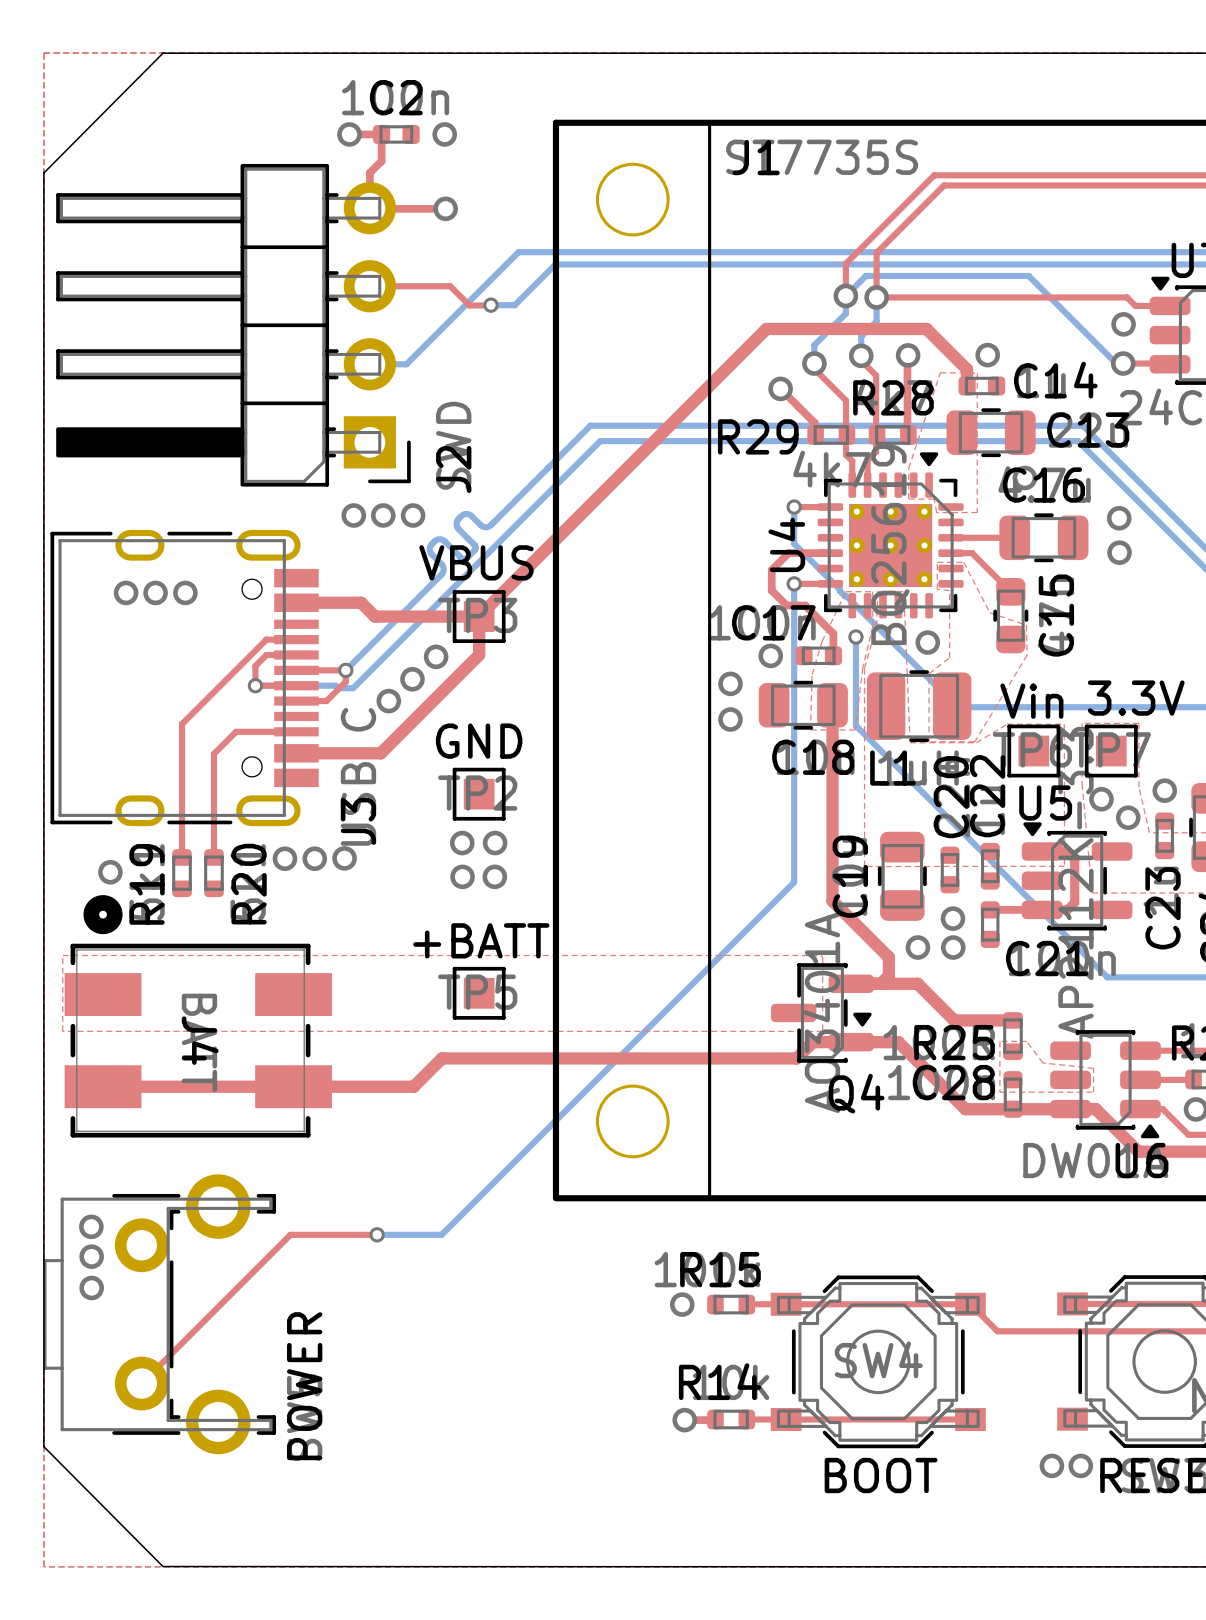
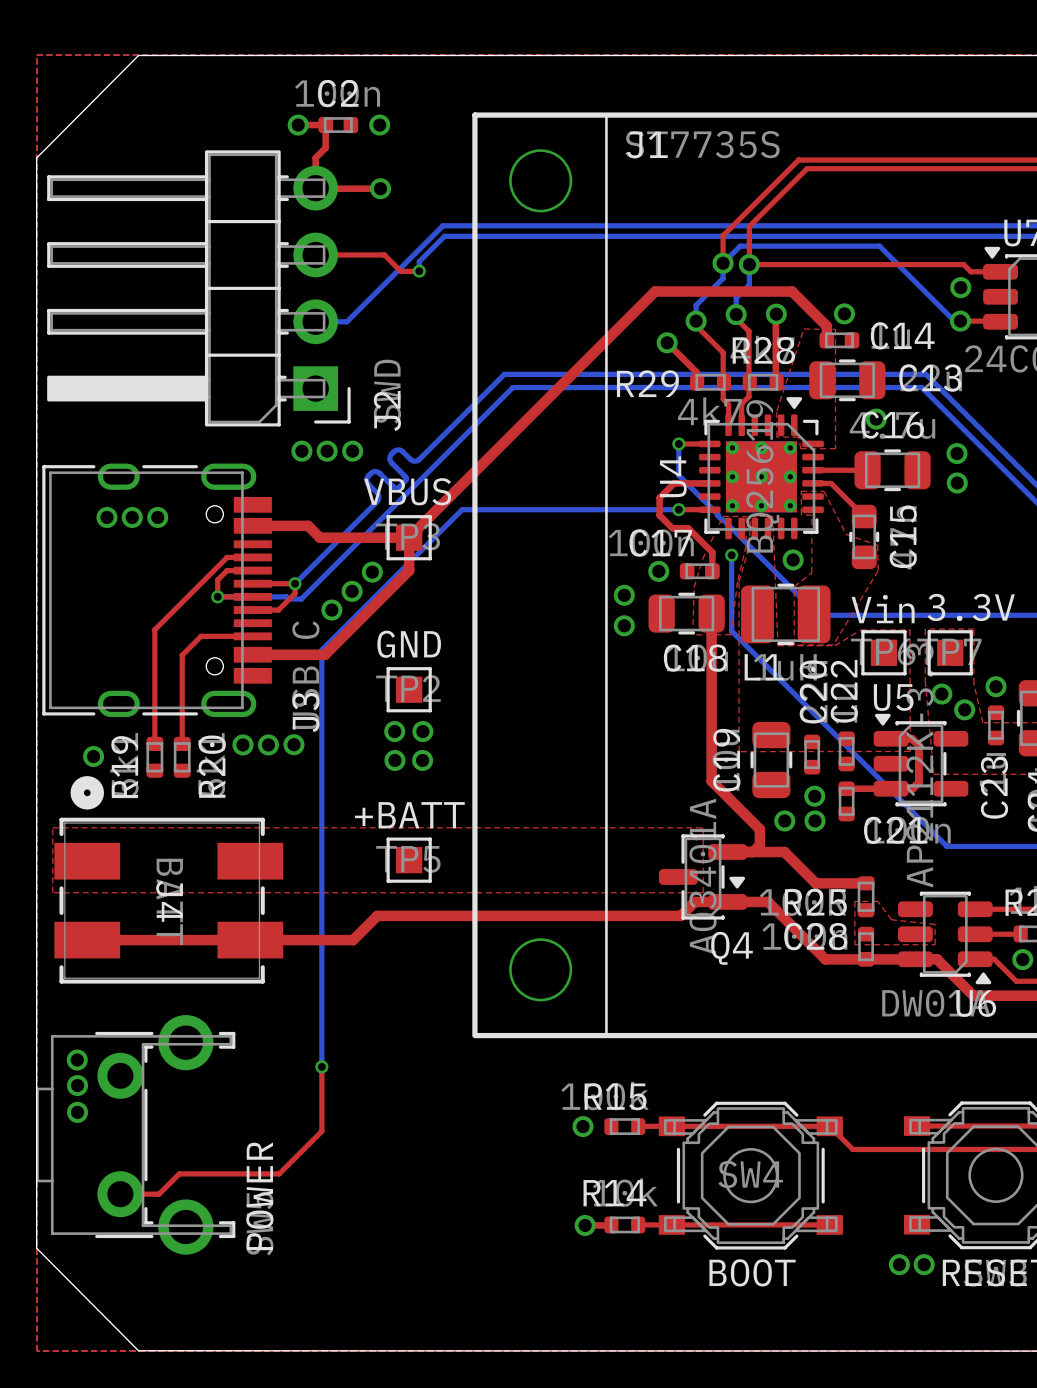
bottom track: (555, 264) (514, 305) (490, 305) -> (474, 236) (444, 236) (419, 261) (419, 271)
bottom track: (794, 583) (794, 882) (441, 1234) (377, 1234) -> (678, 509) (462, 509) (321, 650) (321, 1066)
top track: (377, 1234) (290, 1234) (141, 1383) -> (321, 1066) (321, 1131) (279, 1173) (179, 1173) (159, 1194) (120, 1194)

